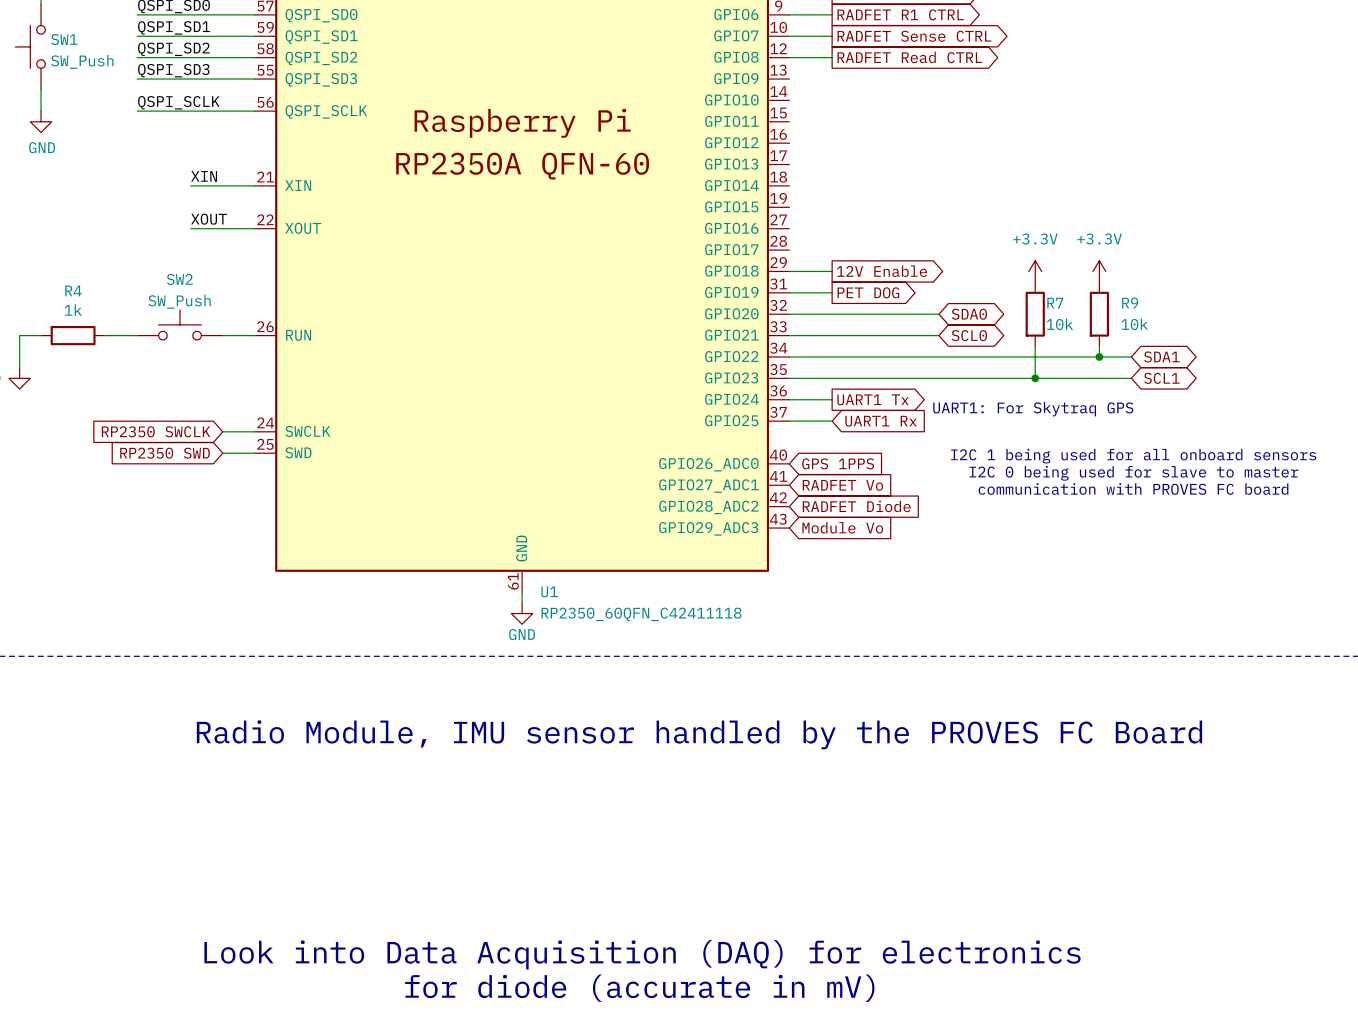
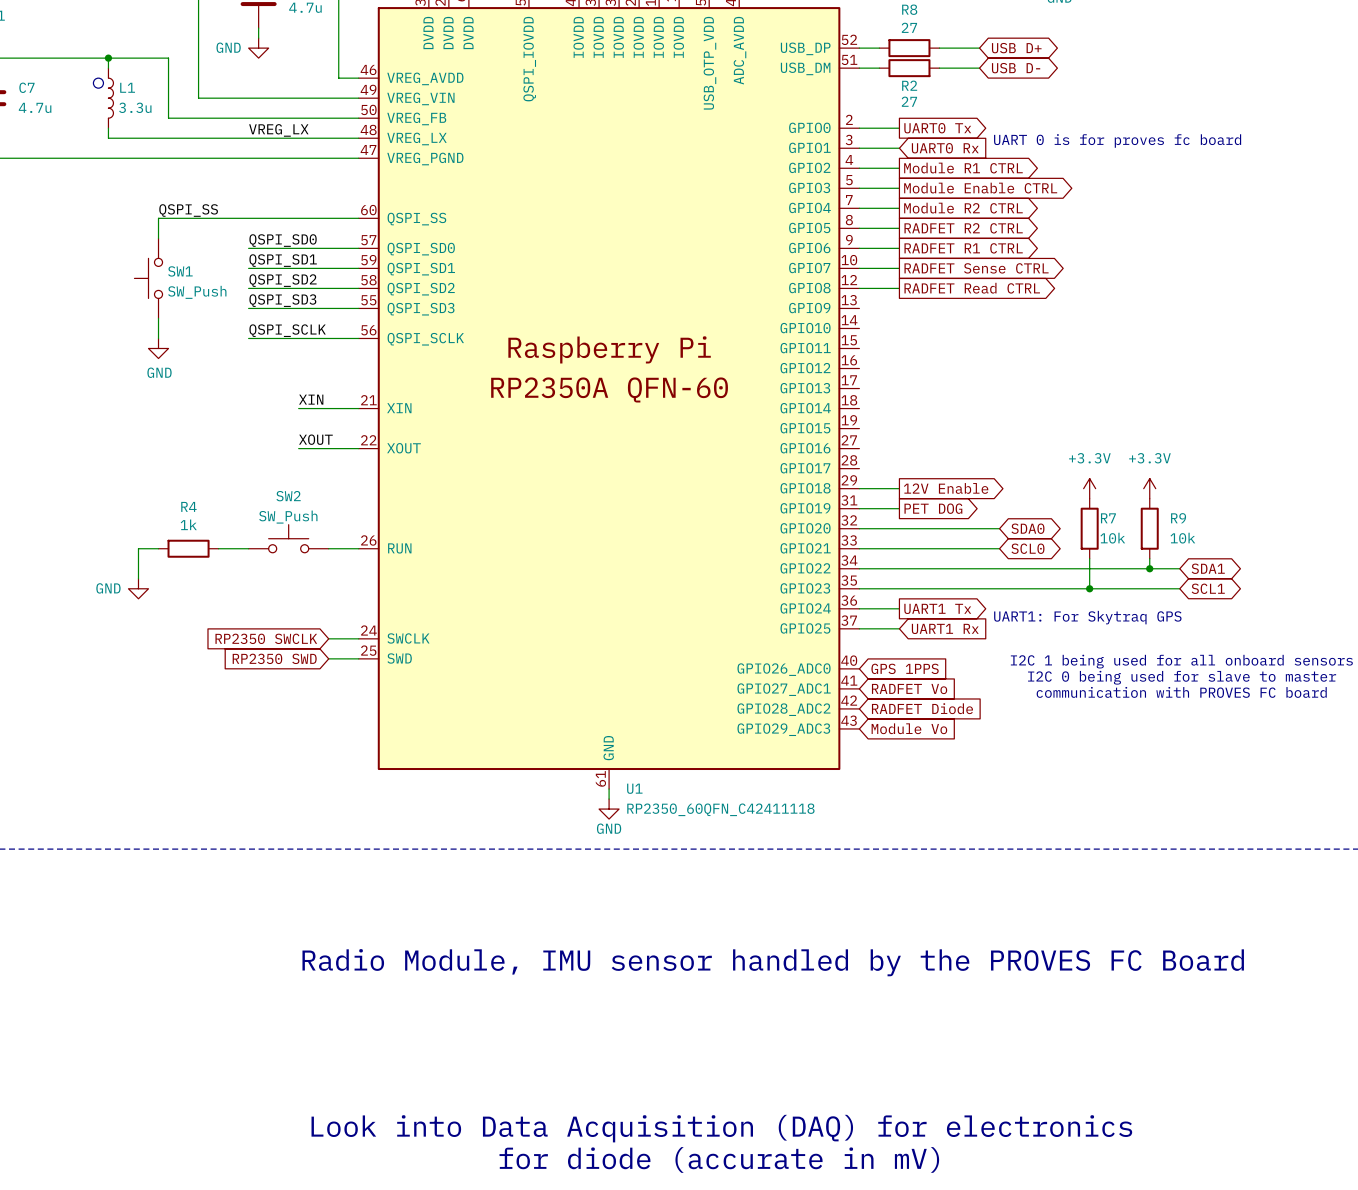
text position: Radio Module, IMU sensor handled by the PROVES FC Board (699, 734) -> Radio Module, IMU sensor handled by the PROVES FC Board (773, 962)

